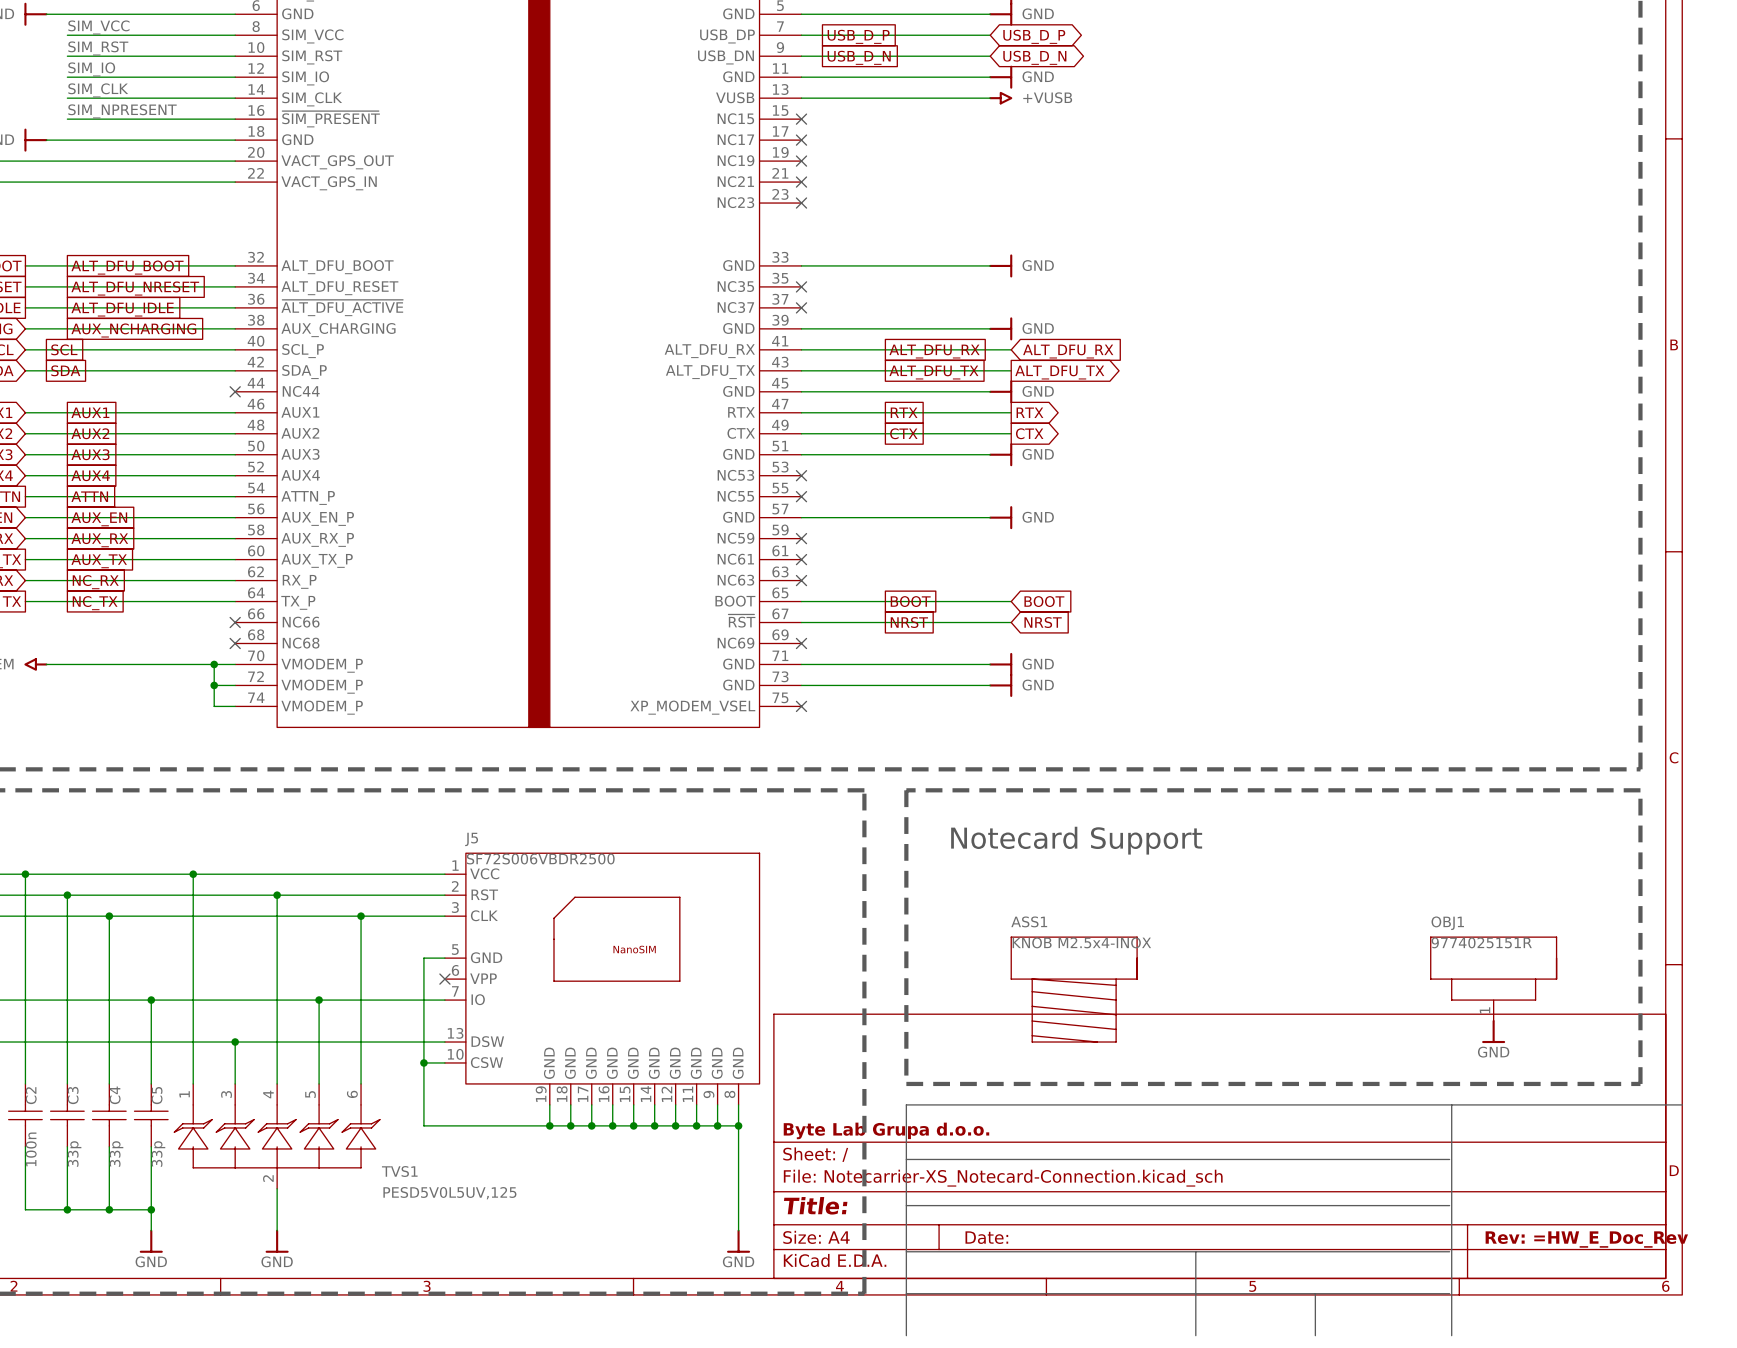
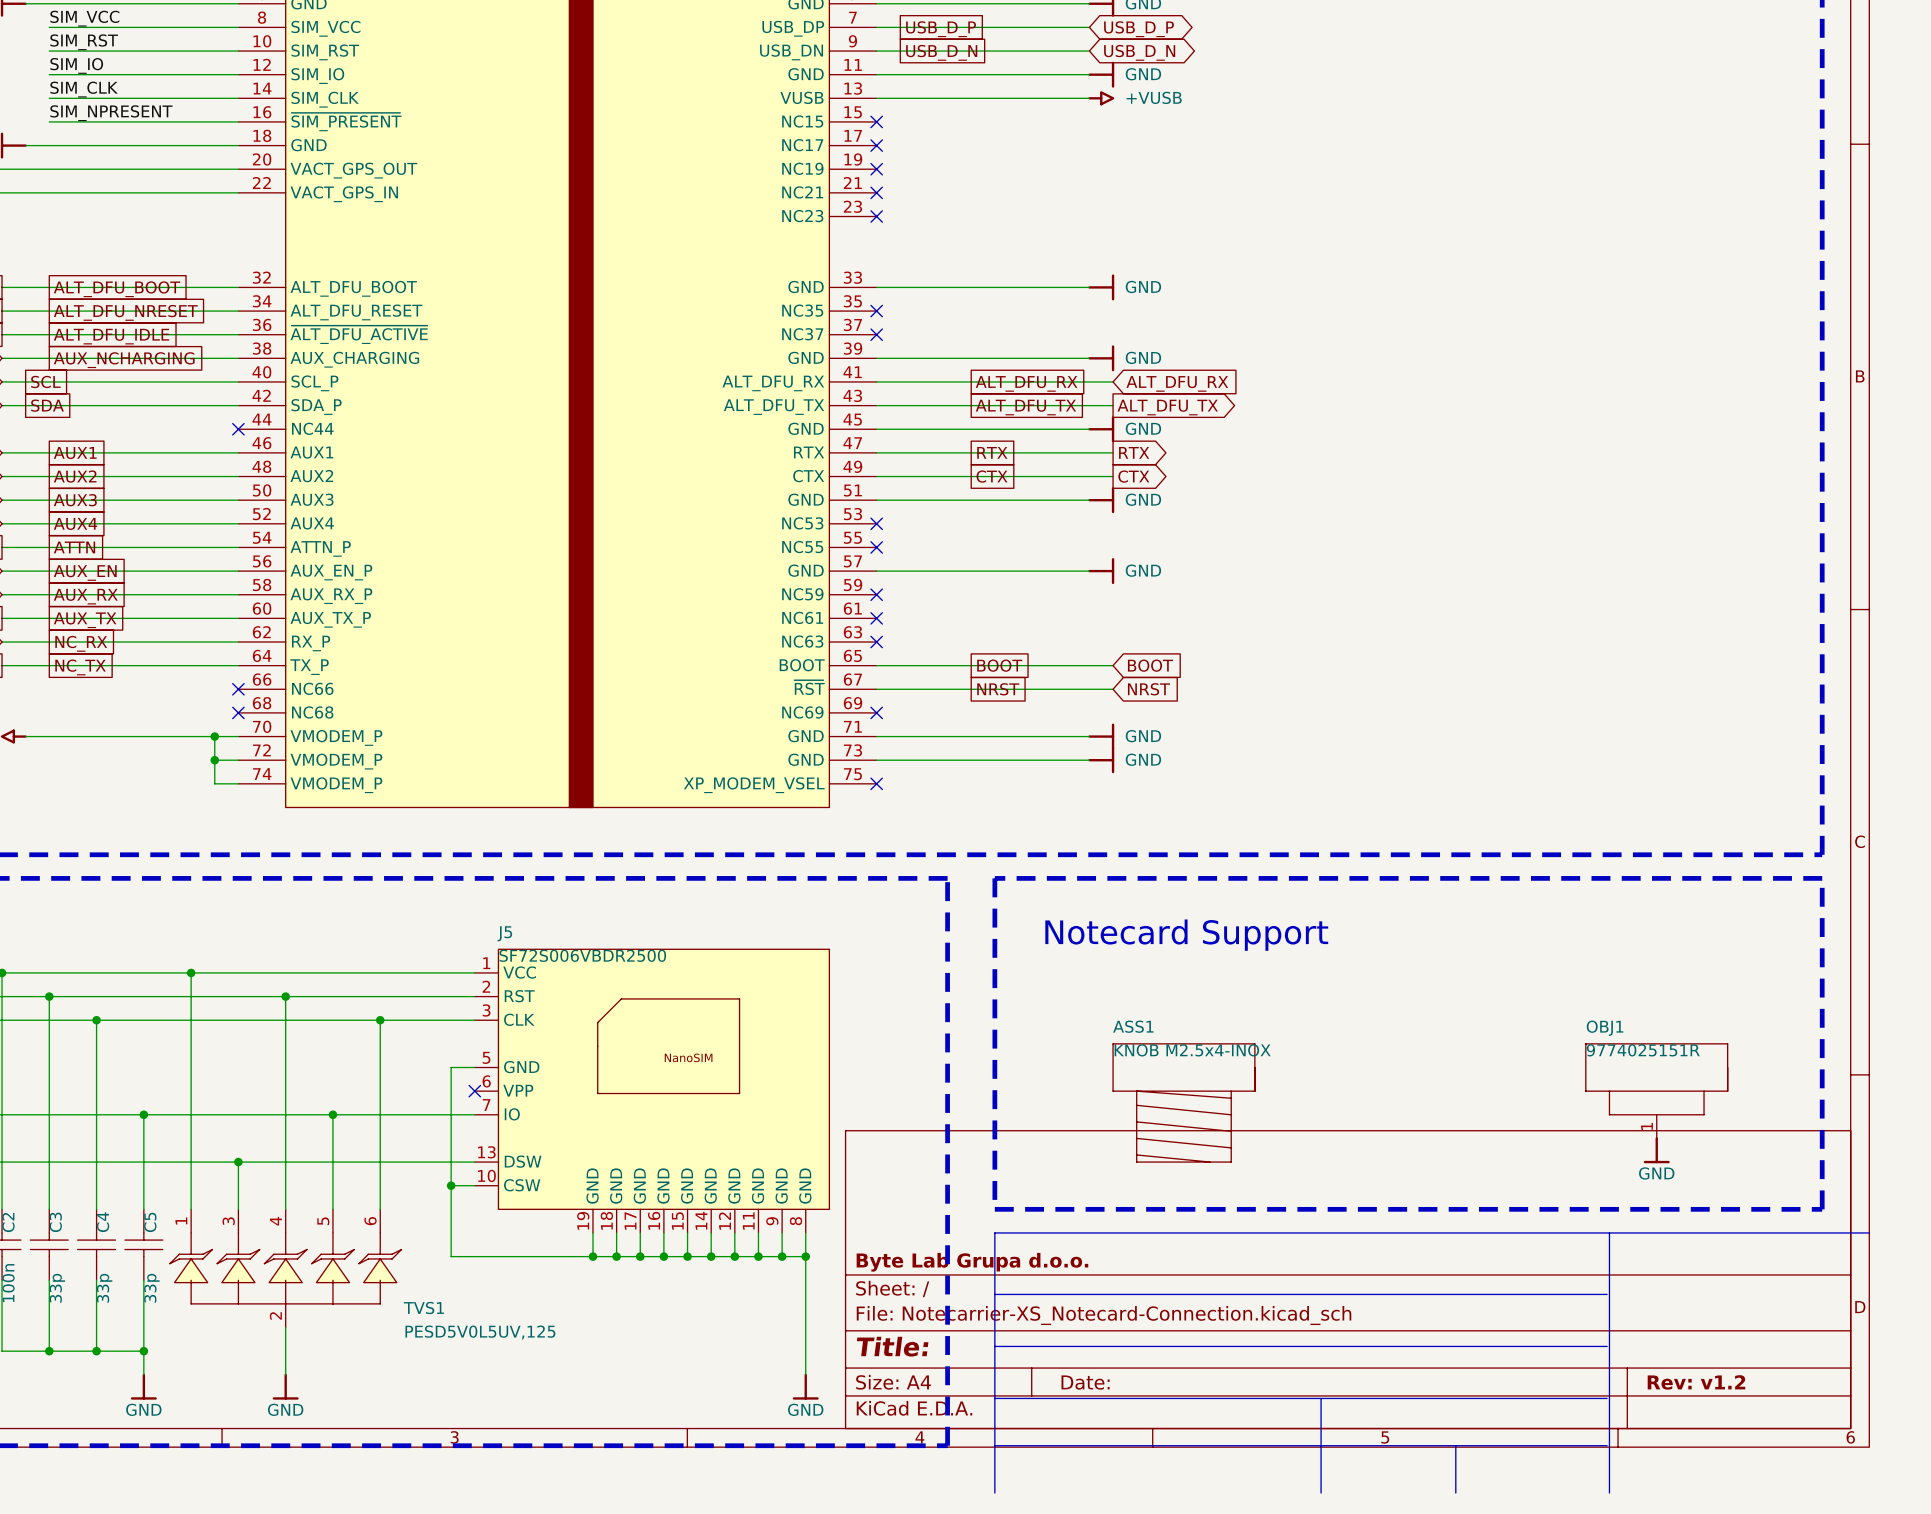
title block: Rev: =HW_E_Doc_Rev (1586, 1239) -> Rev: v1.2 (1696, 1382)

